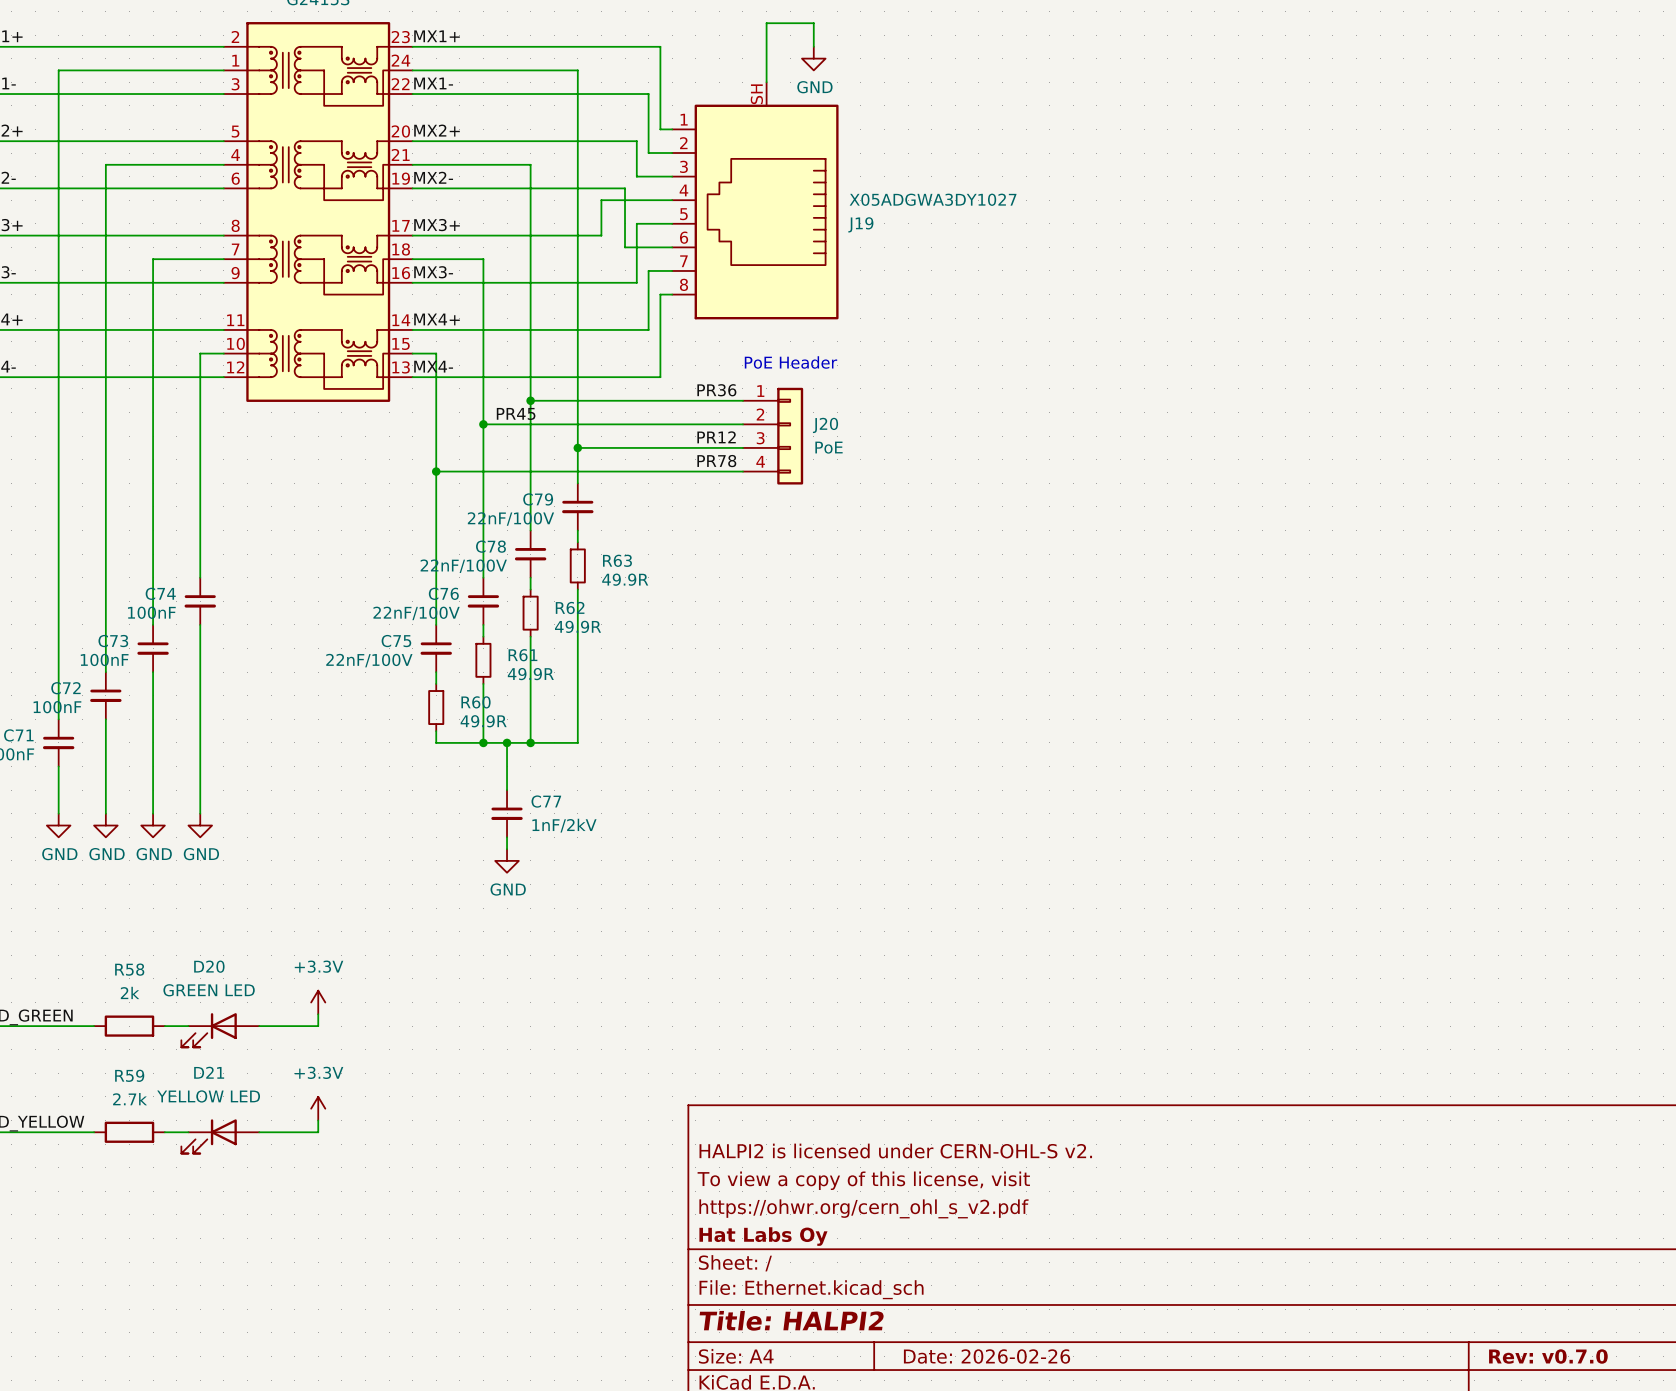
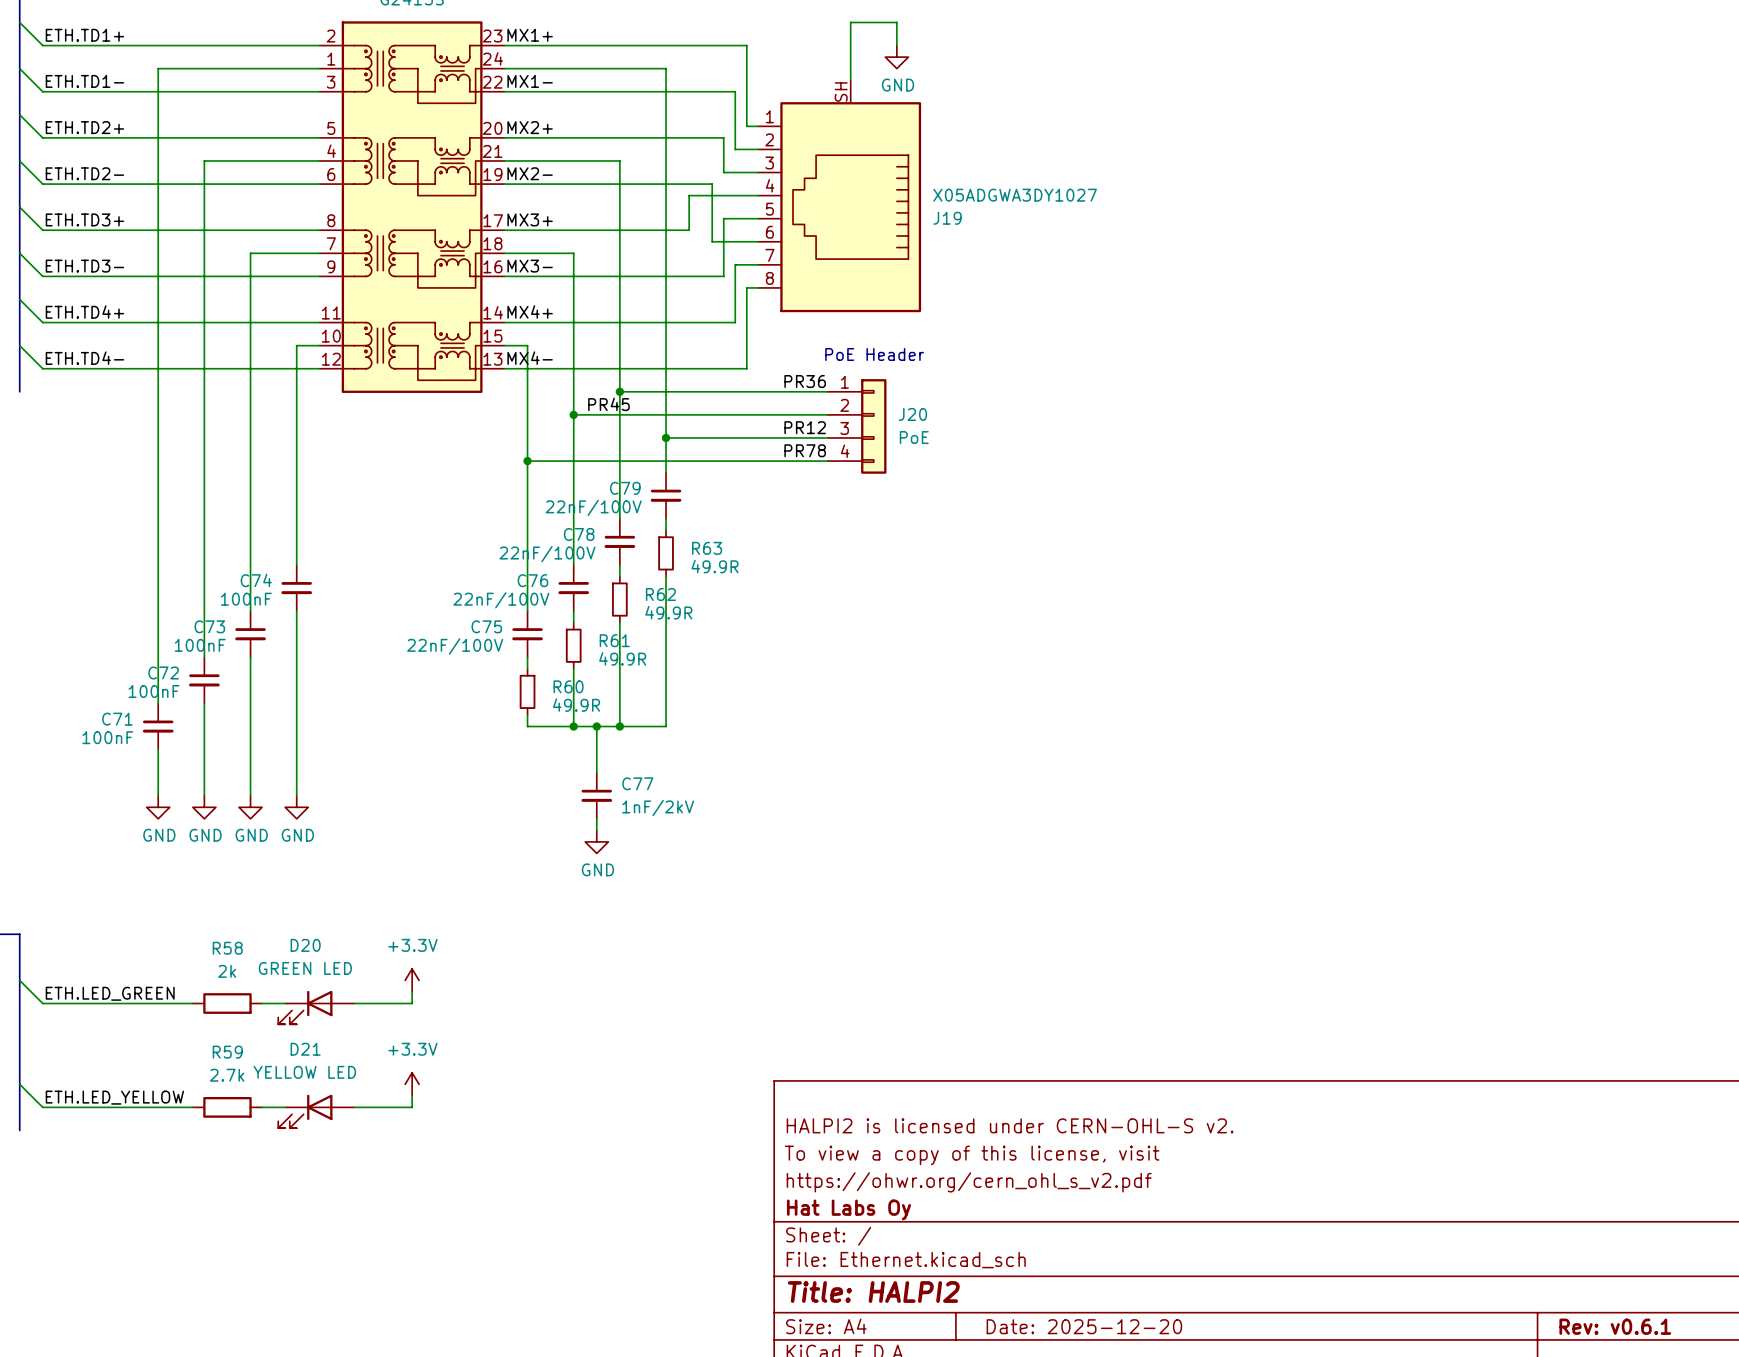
title block: Date: 2026-02-26 (987, 1356) -> Date: 2025-12-20 (1084, 1326)
title block: Rev: v0.7.0 (1548, 1356) -> Rev: v0.6.1 (1615, 1326)

